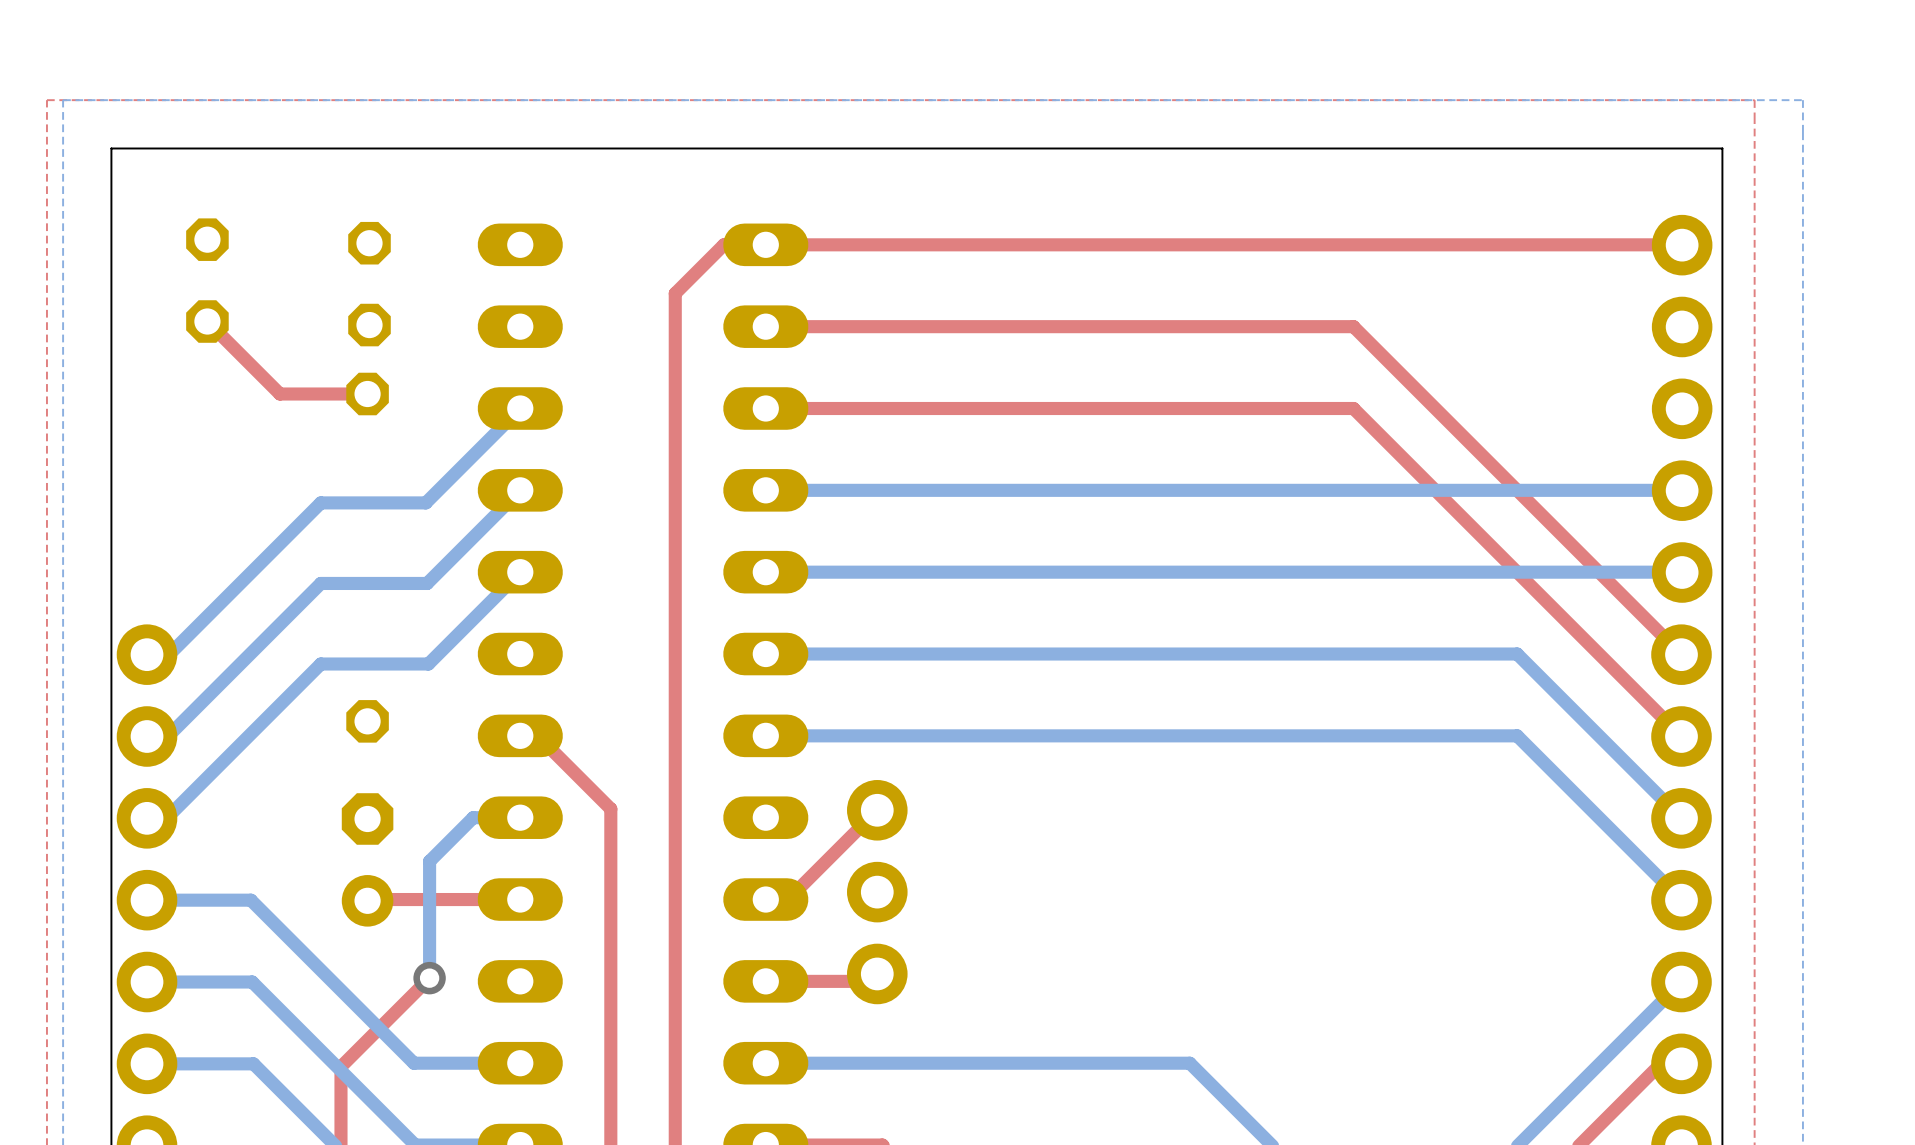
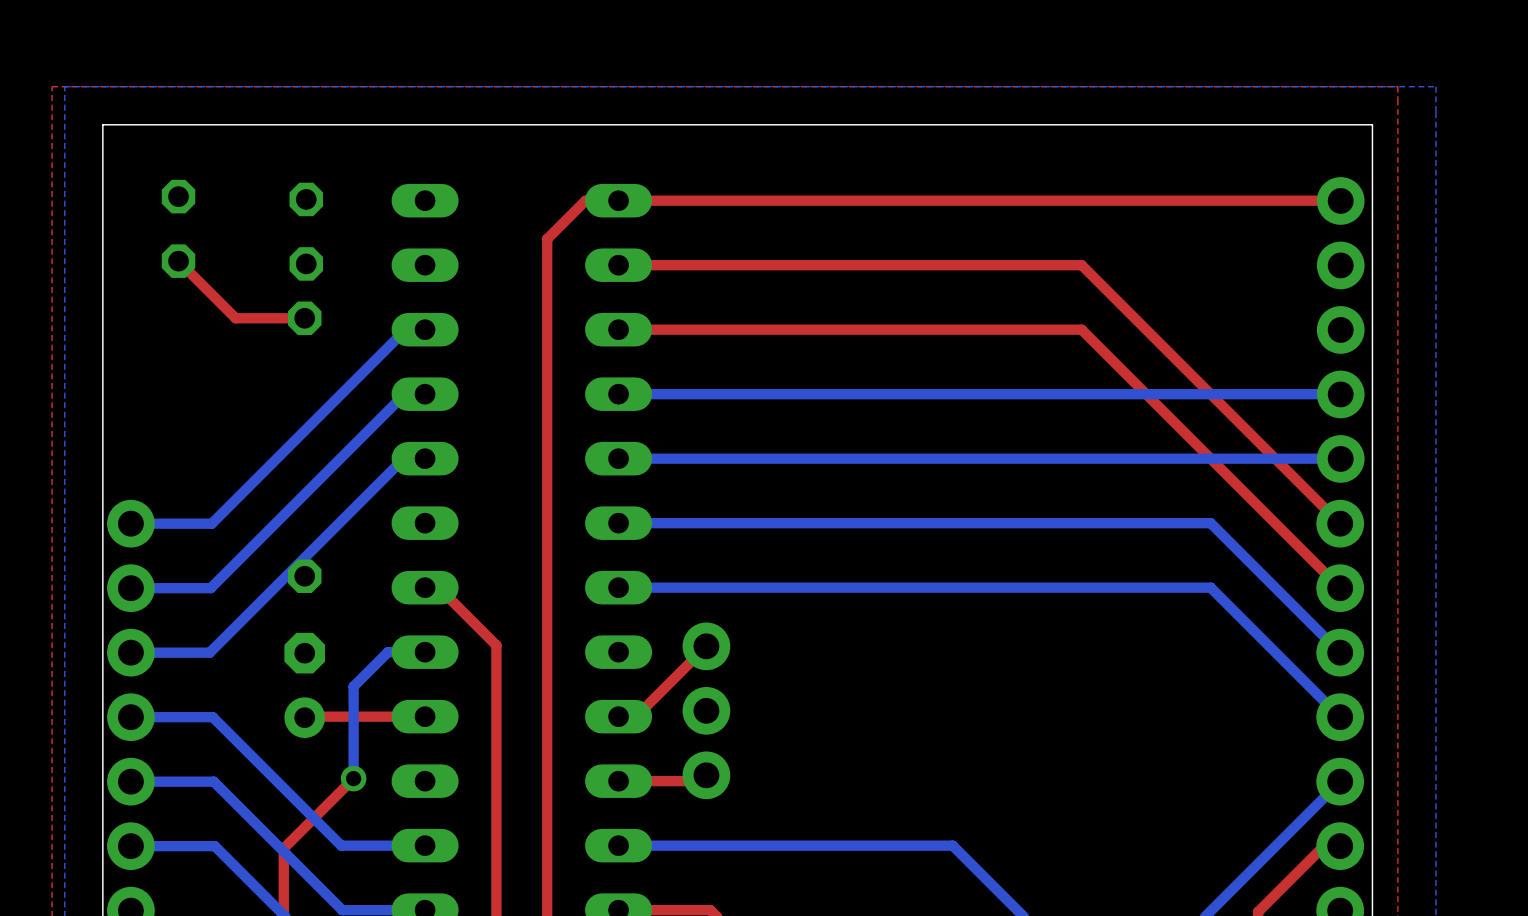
bottom track: (520, 408) (425, 502) (320, 502) (169, 654) -> (425, 329) (405, 329) (267, 467)
bottom track: (520, 490) (427, 583) (320, 583) -> (425, 394) (404, 394) (267, 531)
bottom track: (520, 572) (428, 664) (320, 664) -> (425, 458) (403, 458) (209, 652) (146, 652)
bottom track: (249, 654) (167, 736) -> (211, 523) (148, 523)
bottom track: (248, 736) (166, 818) -> (210, 588) (147, 588)

